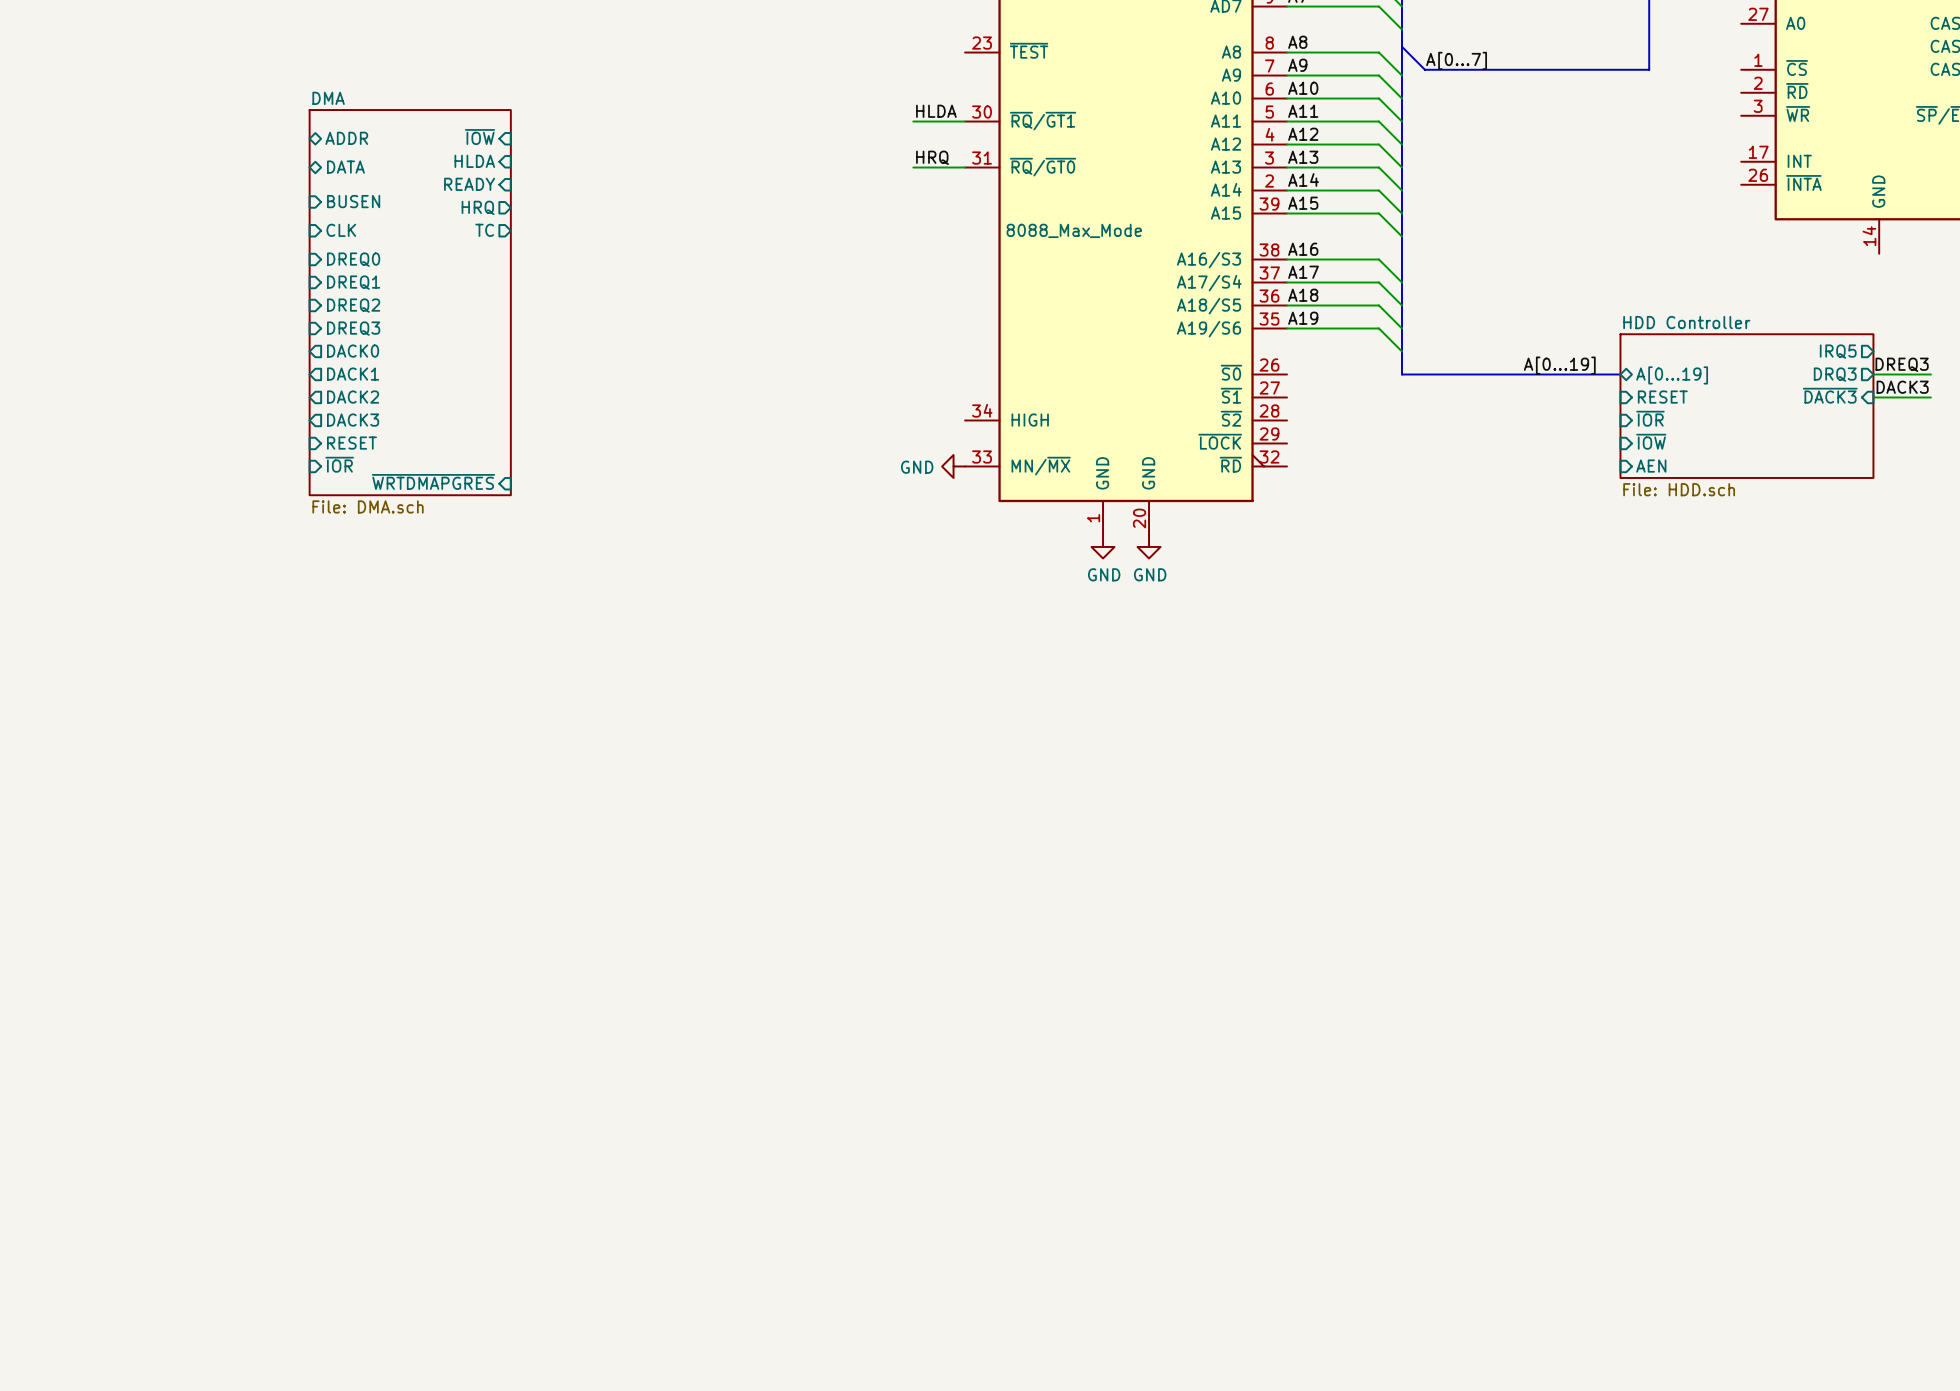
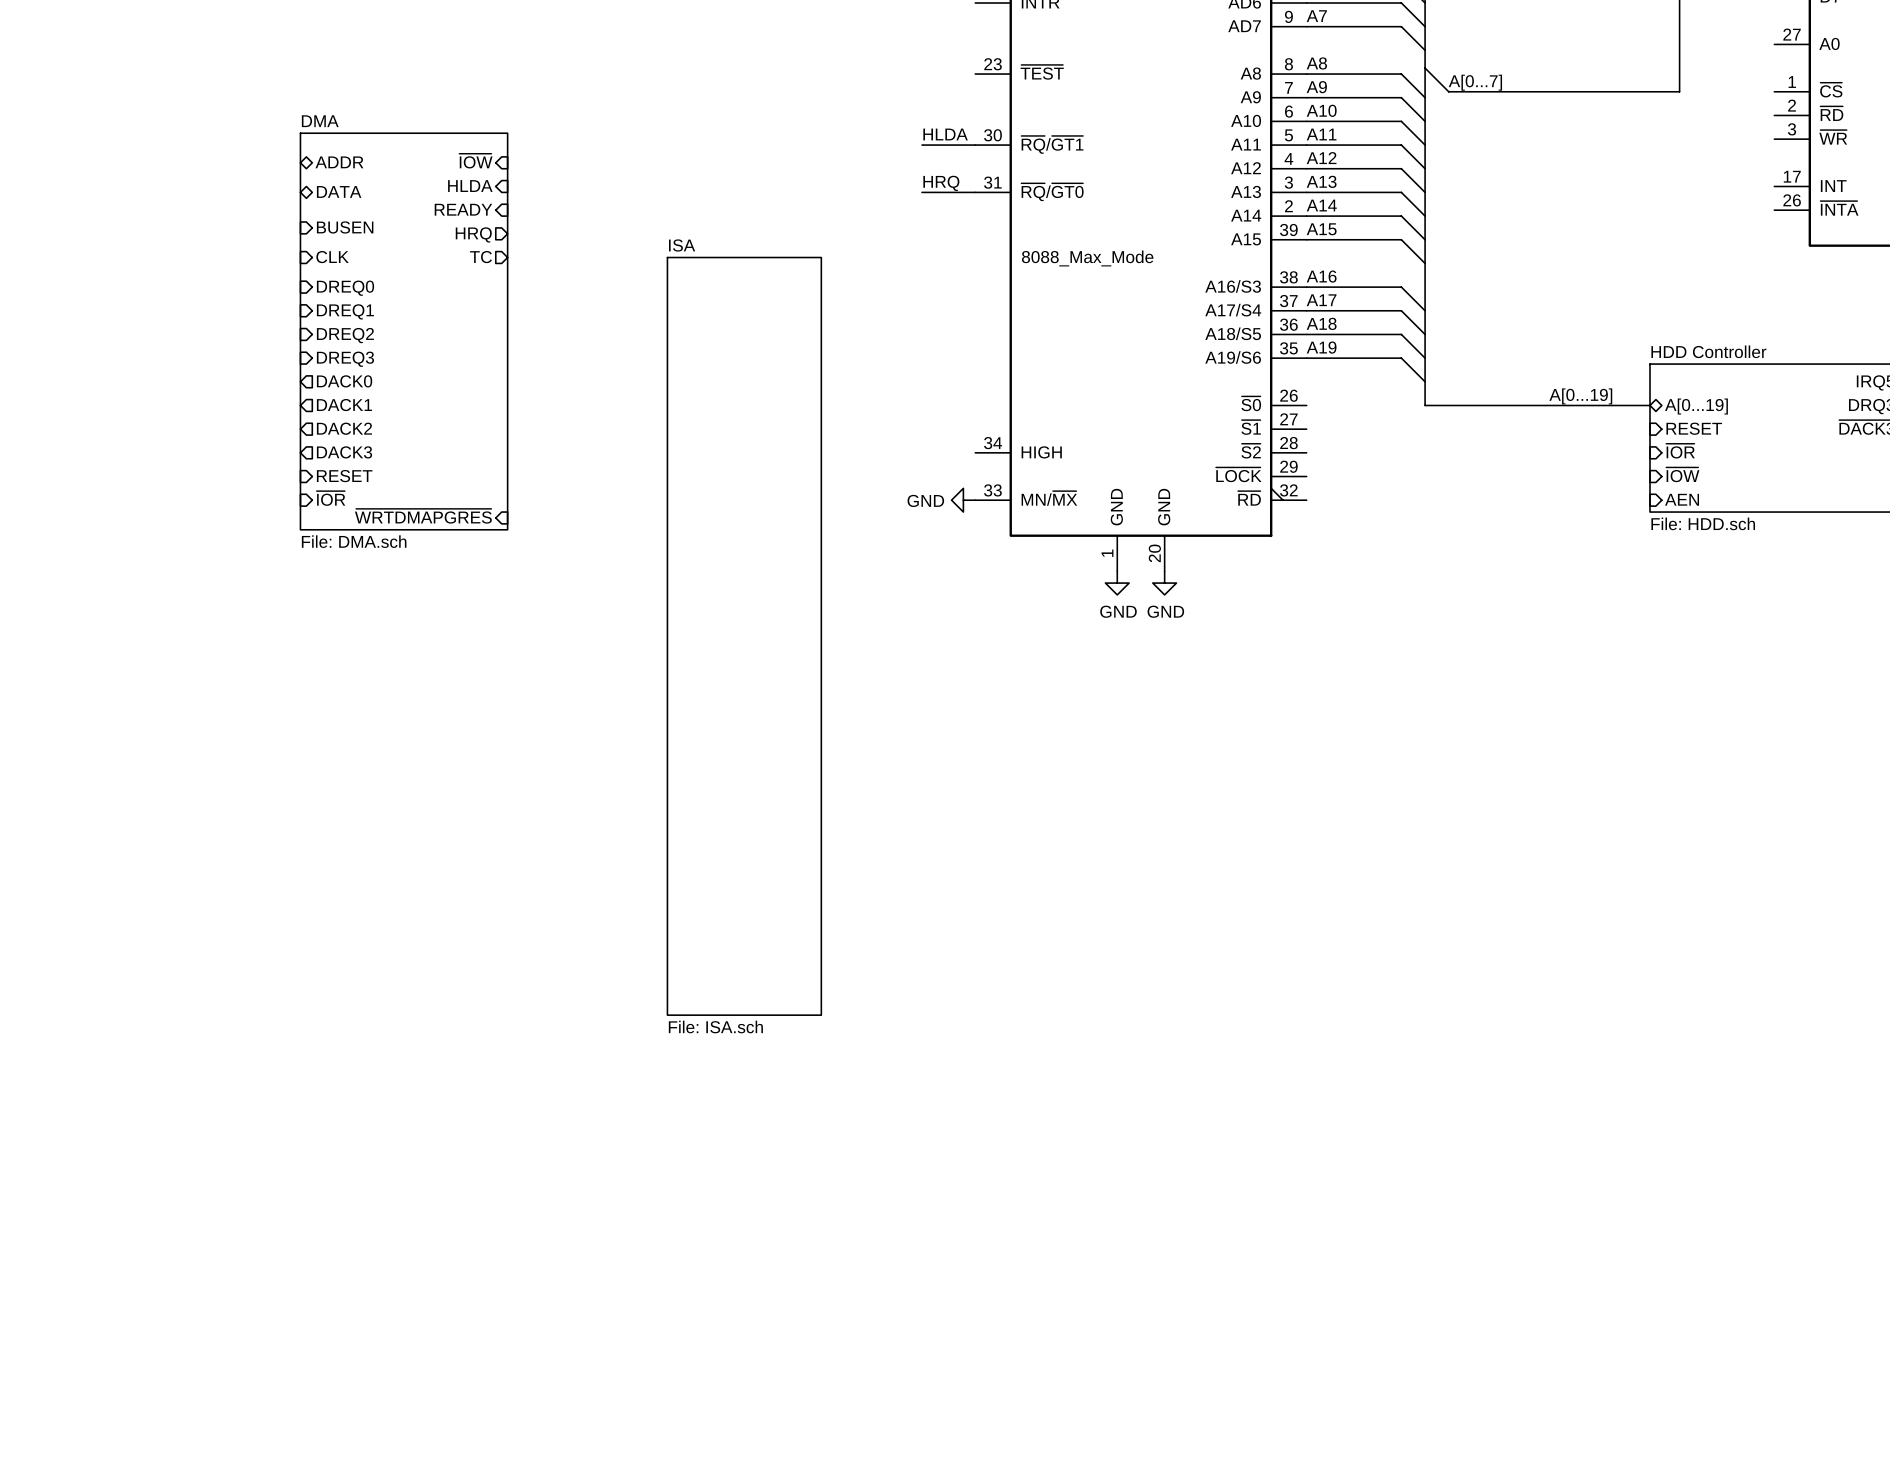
sheet ISA: none -> File: ISA.sch (744, 636)

